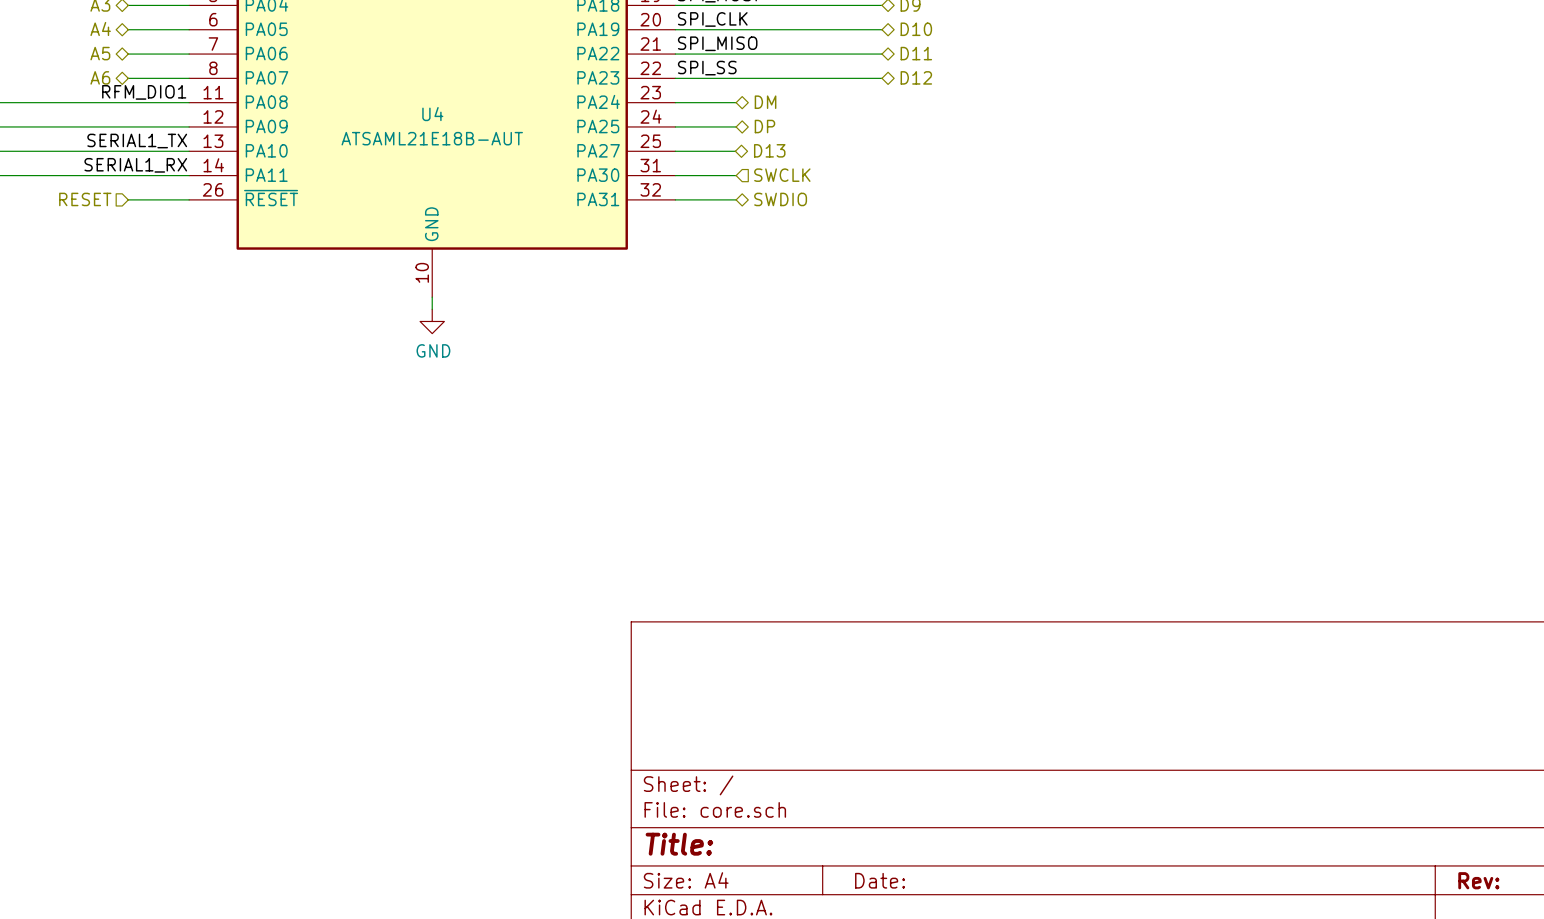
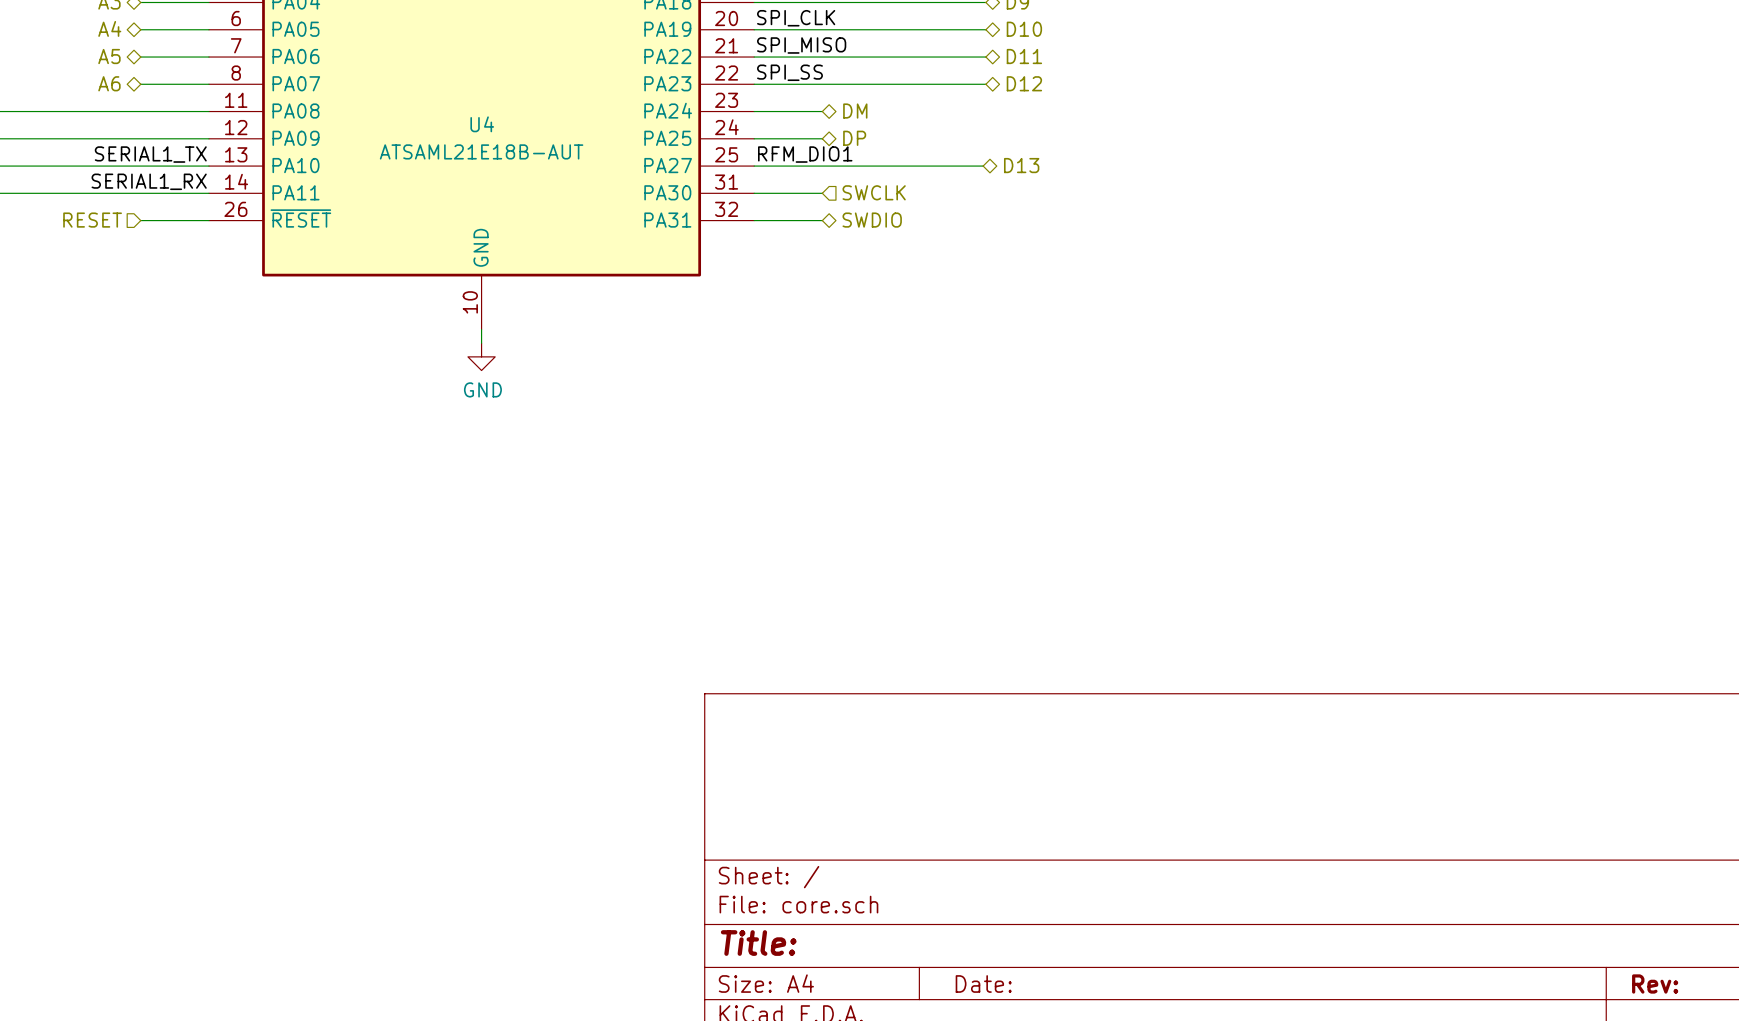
label: RFM_DIO1 (144, 92) -> none
label: none -> RFM_DIO1 (805, 154)
hierarchical label position: D13 (769, 150) -> D13 (1021, 165)
wire: none -> (821, 166) (983, 166)

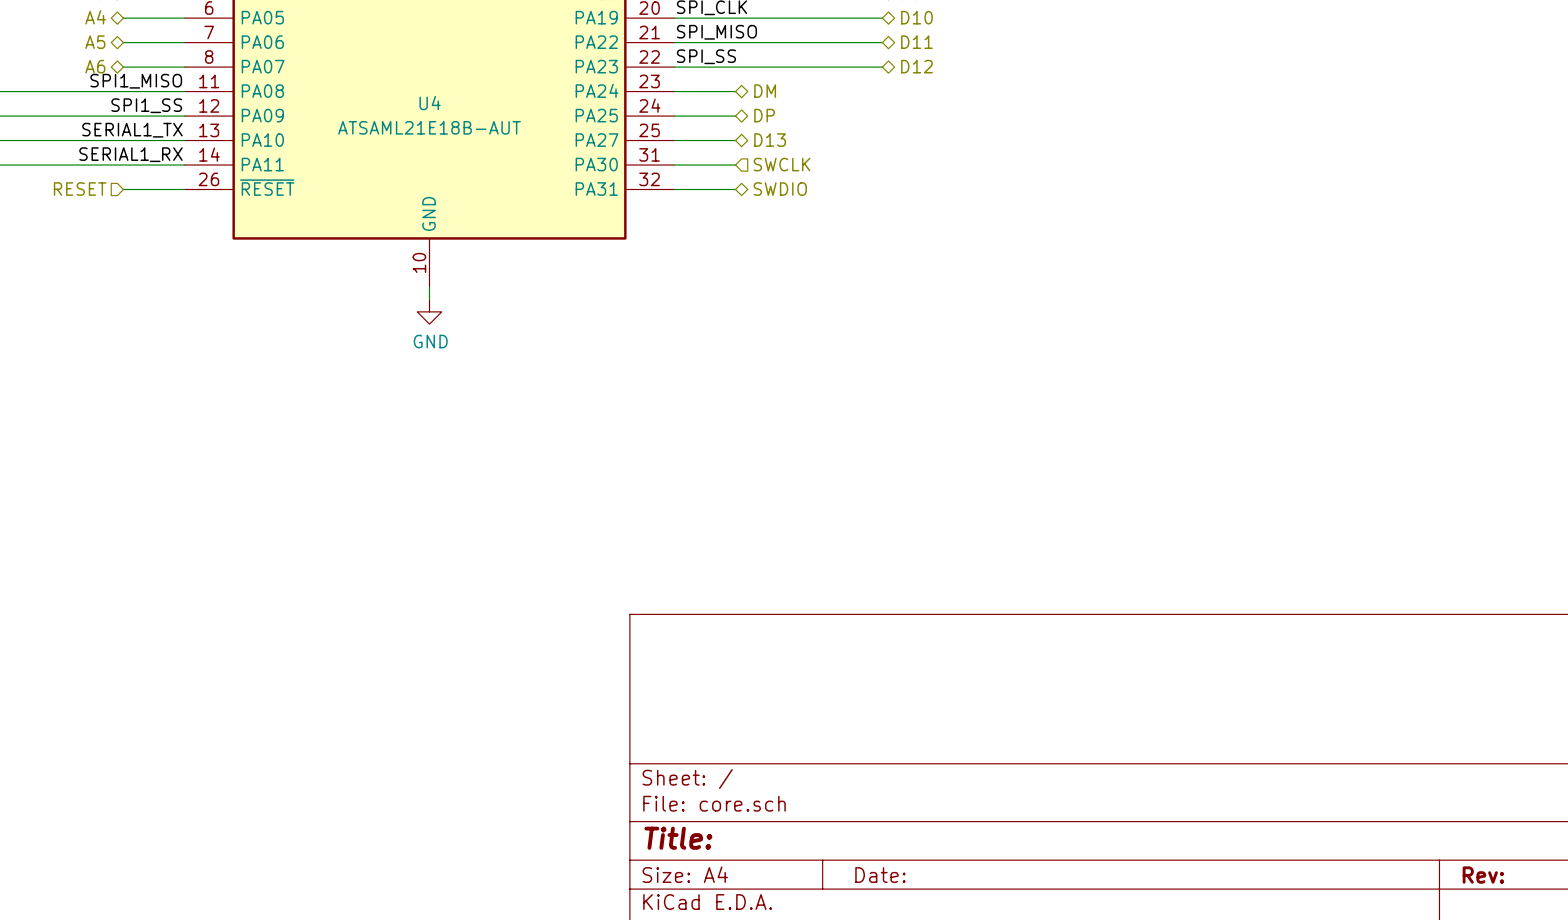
label: none -> SPI1_MISO (136, 81)
label: none -> SPI1_SS (146, 105)
label: RFM_DIO1 (805, 154) -> none
hierarchical label position: D13 (1021, 165) -> D13 (770, 140)
wire: (822, 166) (983, 166) -> none

